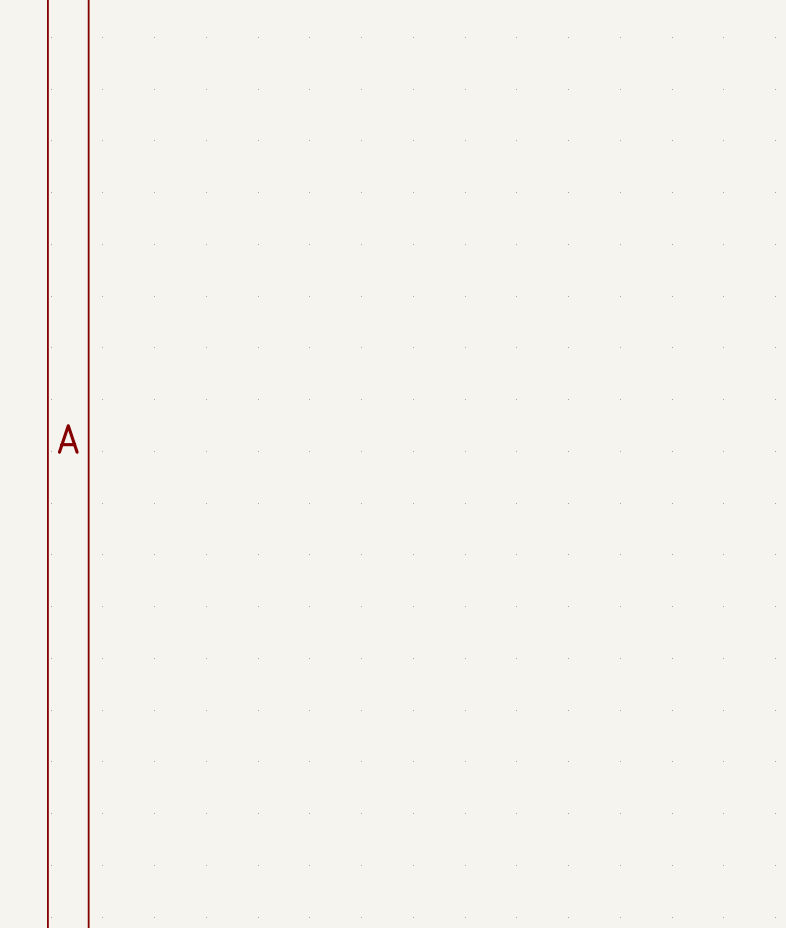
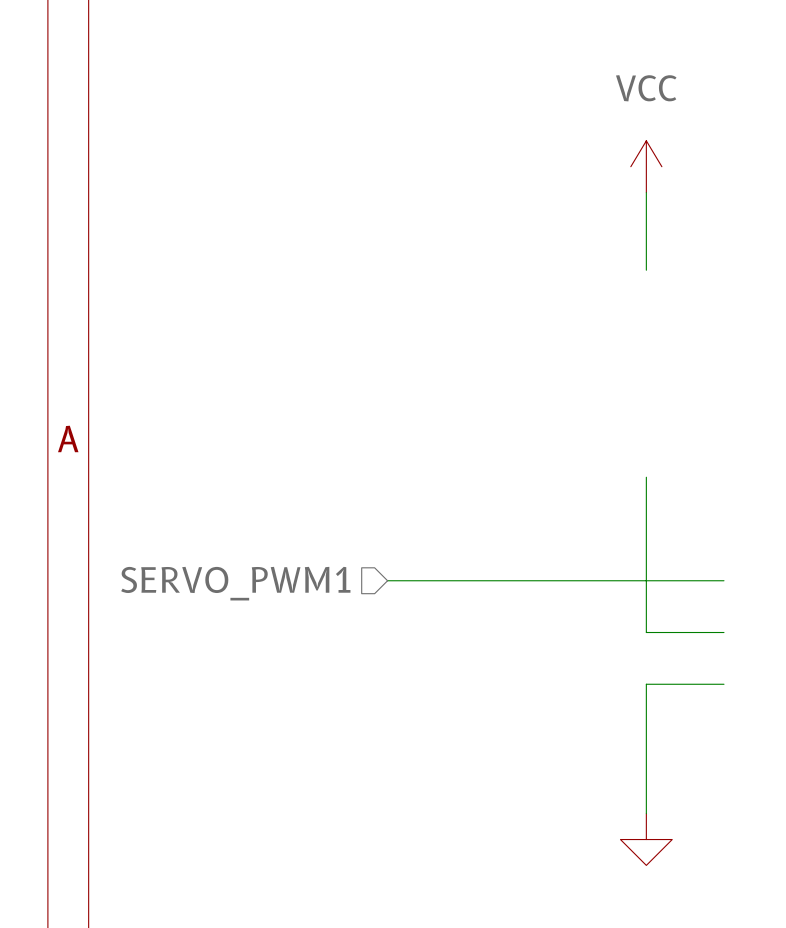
power symbol: none -> VCC (646, 166)
wire: none -> (646, 192) (646, 270)
wire: none -> (646, 477) (646, 632) (723, 632)
wire: none -> (387, 580) (723, 580)
hierarchical label: none -> SERVO_PWM1 (235, 583)
wire: none -> (723, 684) (646, 684) (646, 813)
power symbol: none -> (646, 839)

